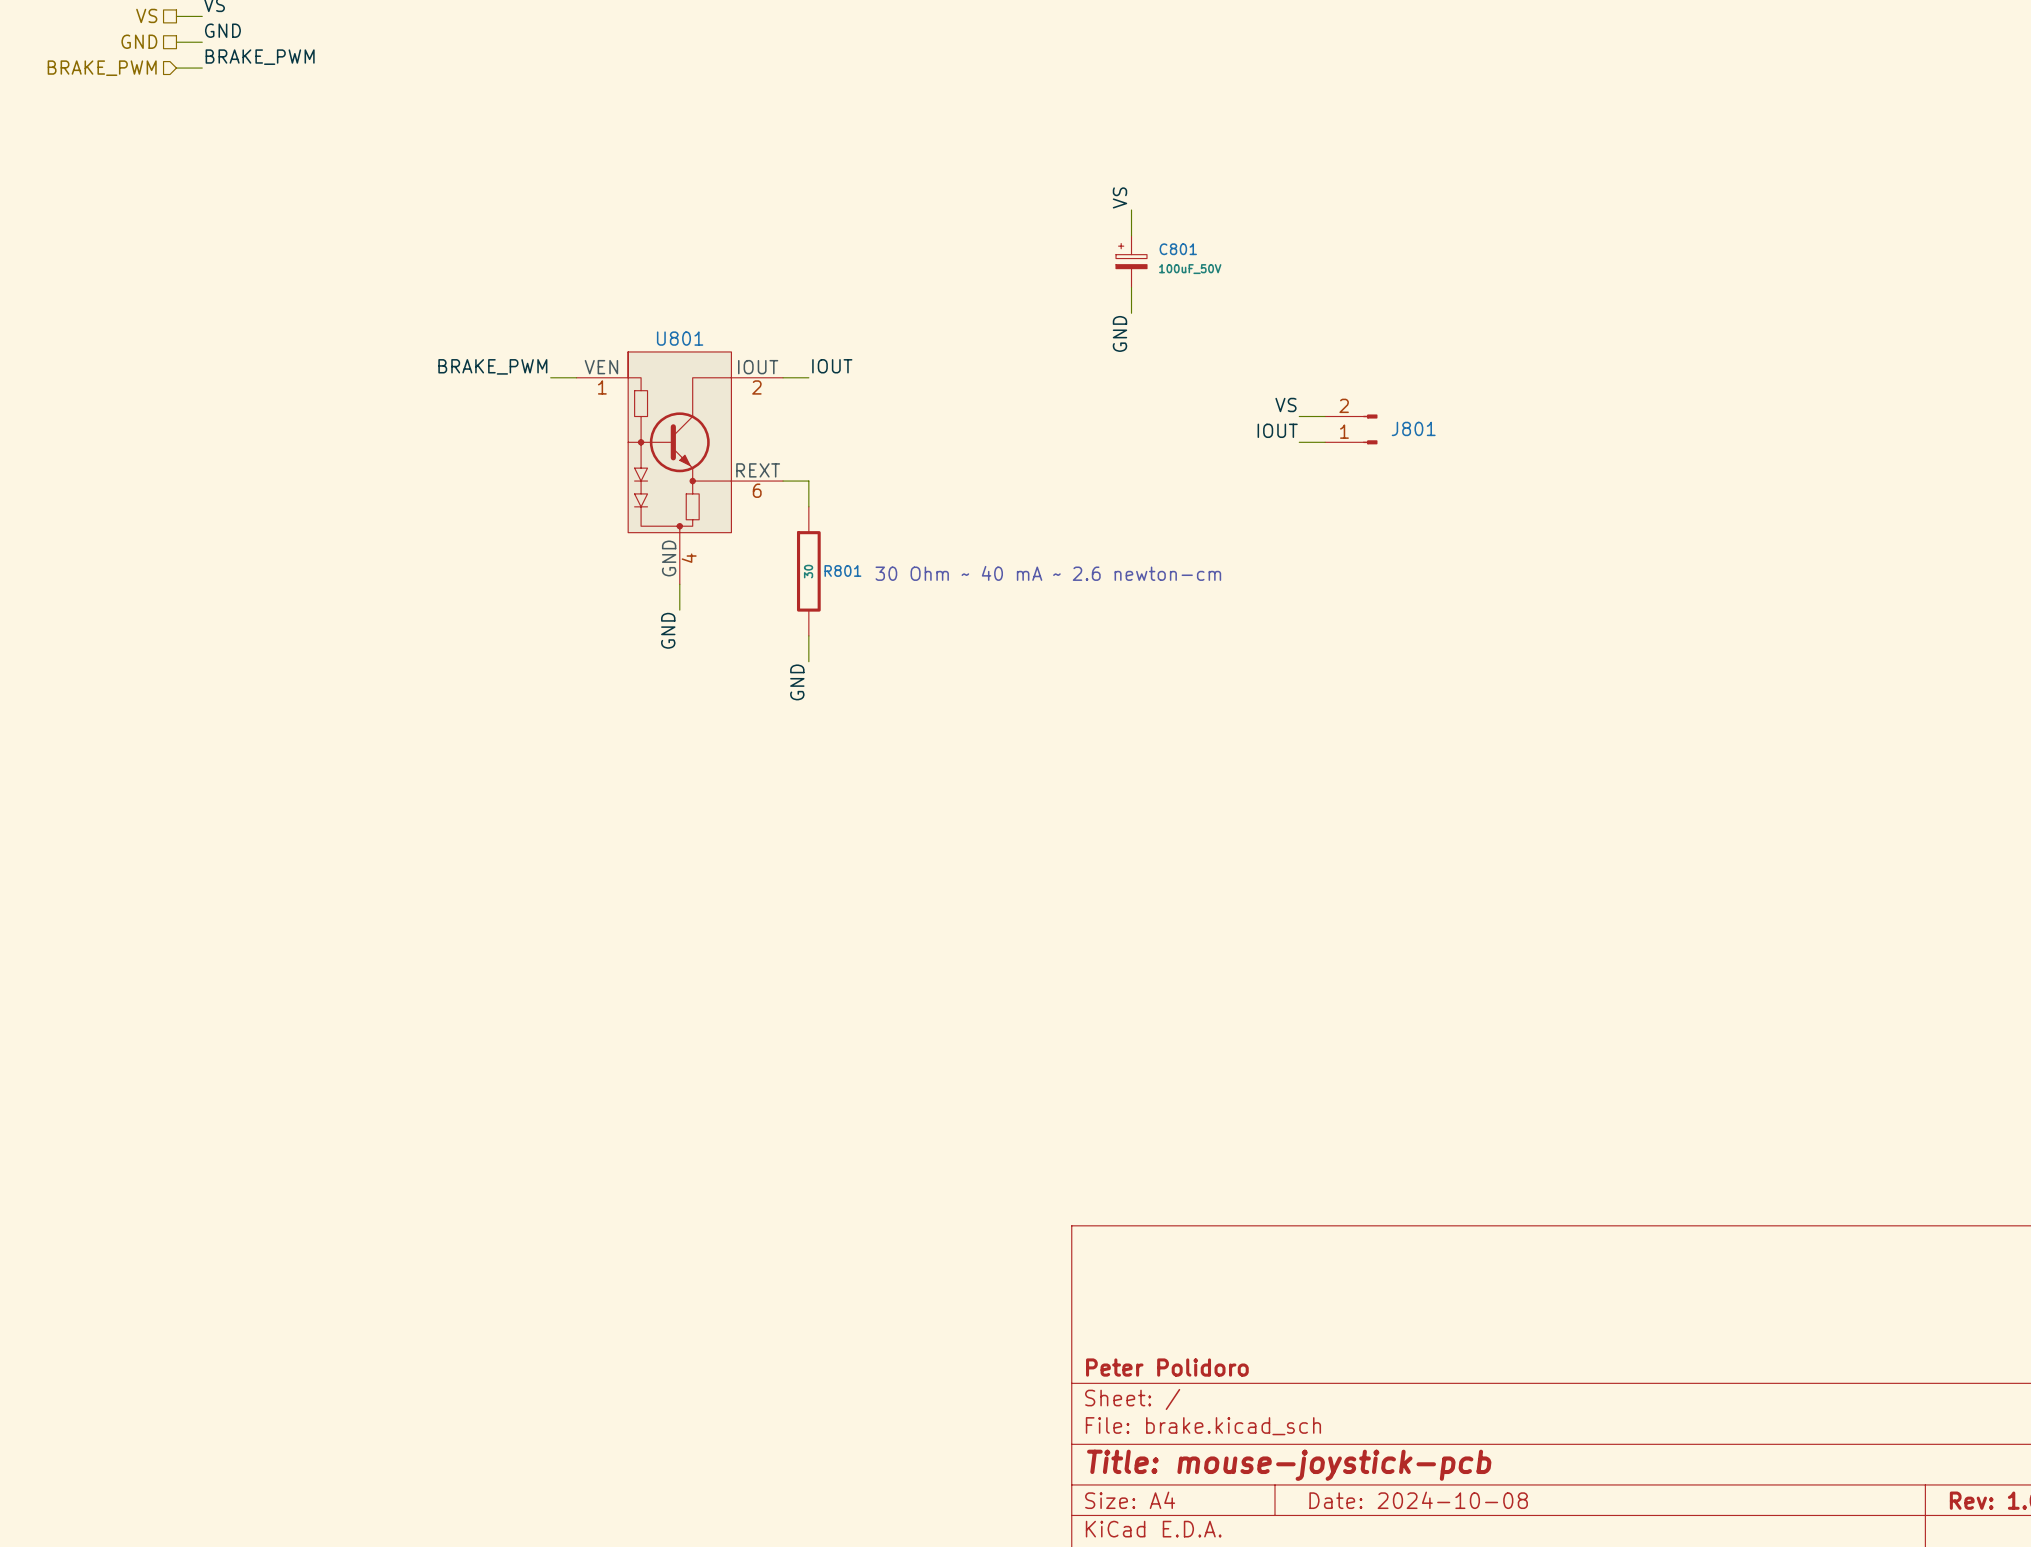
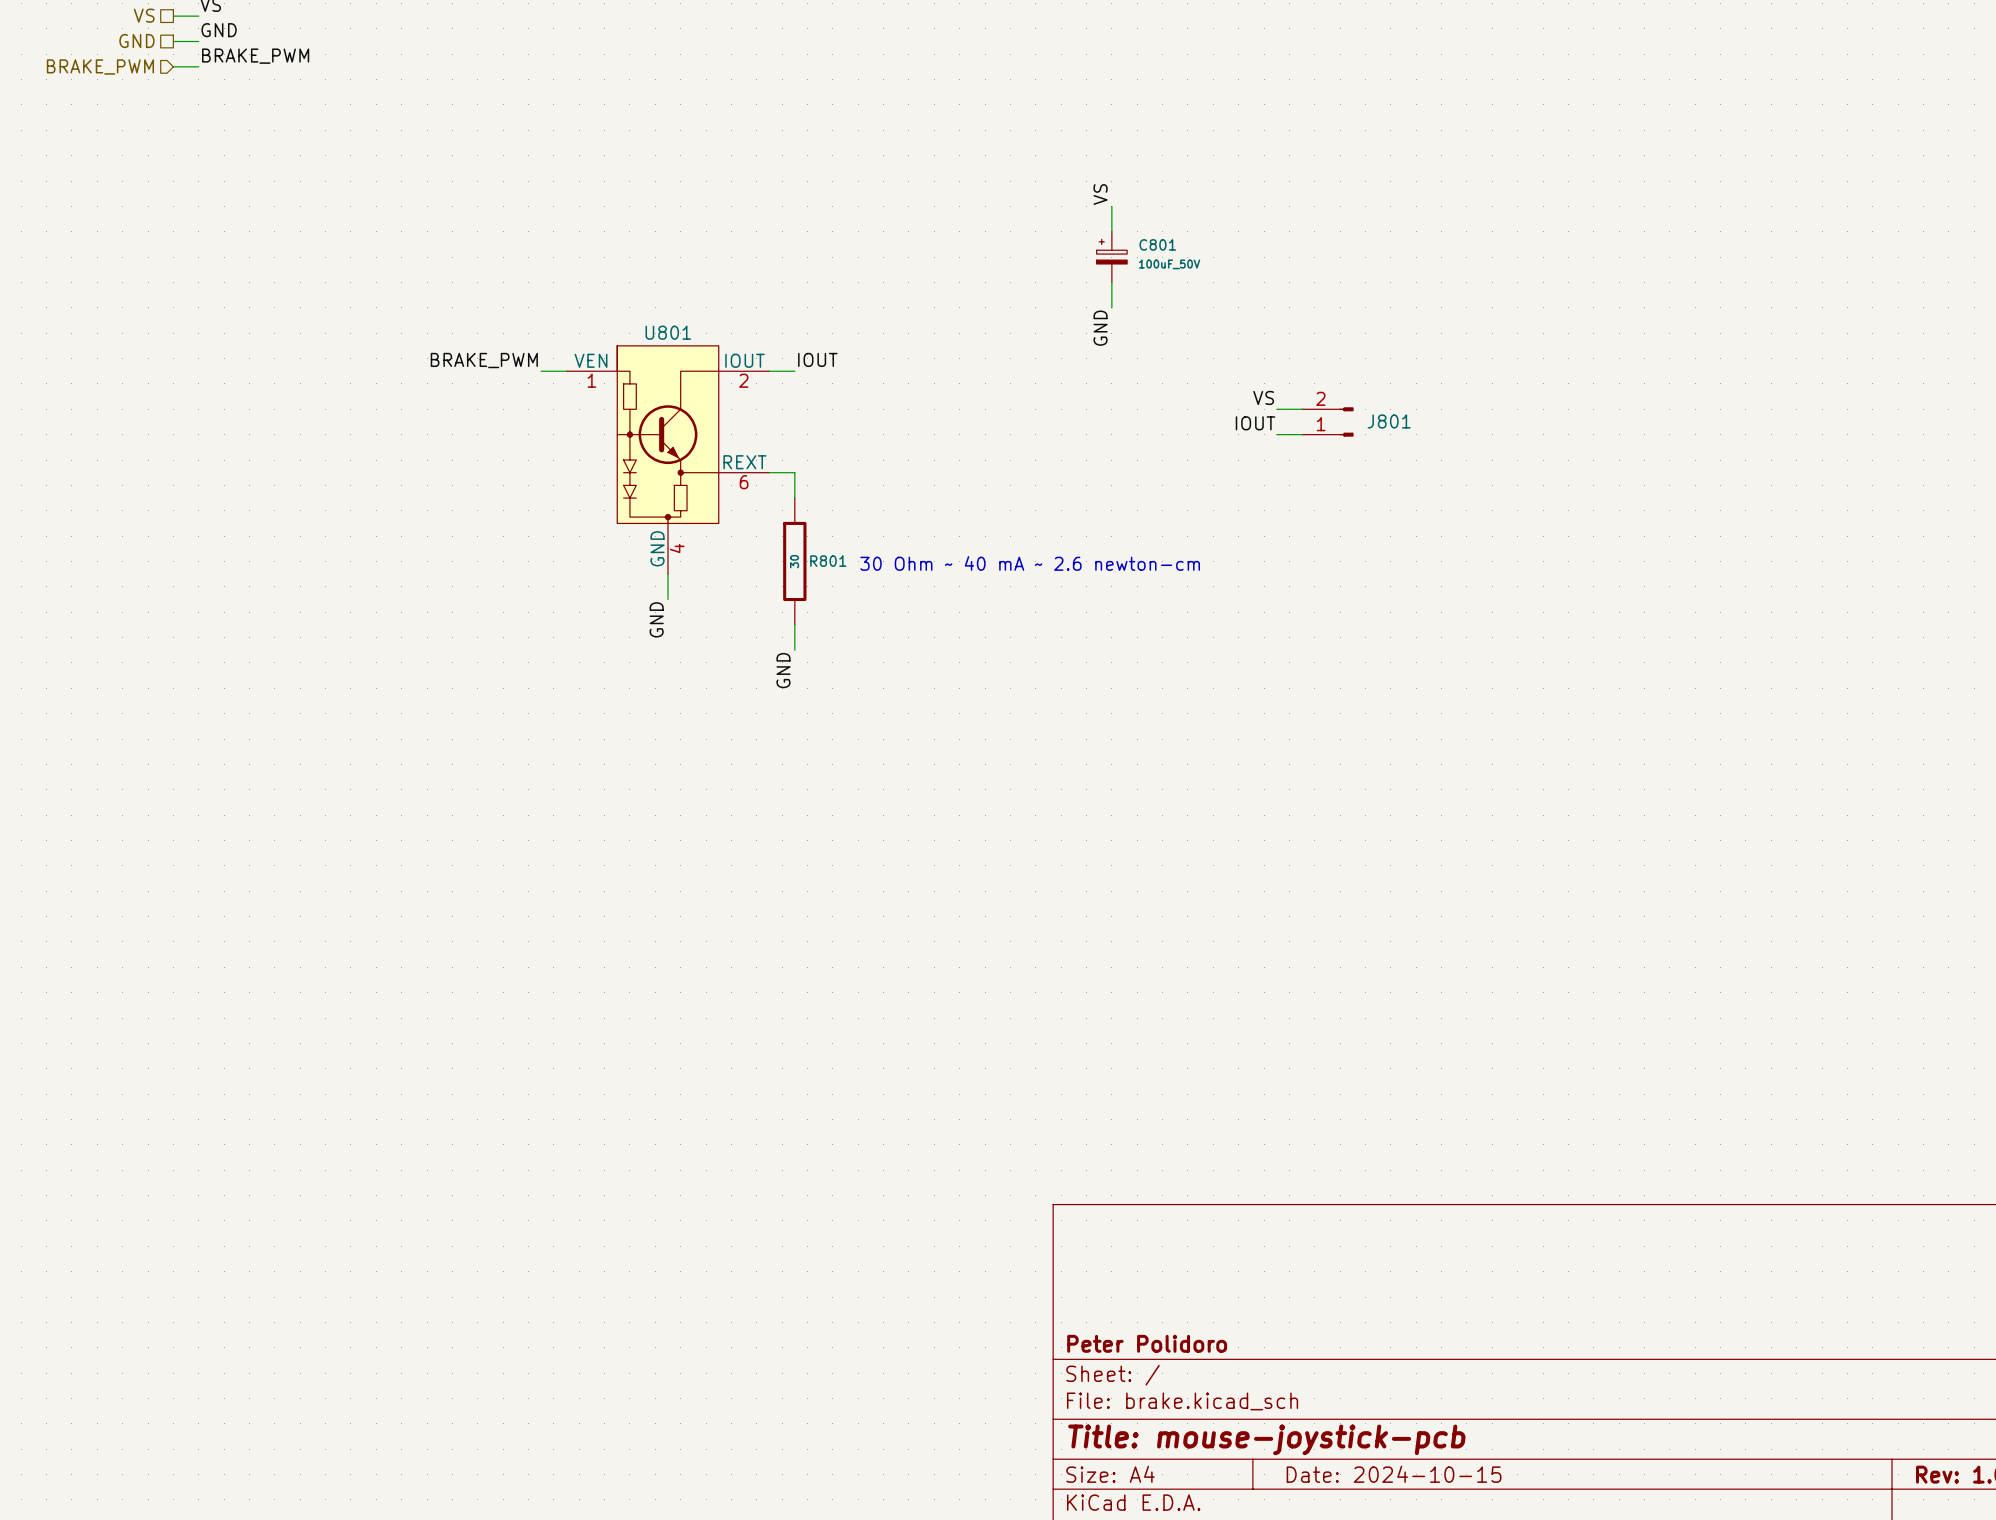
title block: Date: 2024-10-08 (1418, 1500) -> Date: 2024-10-15 (1394, 1474)

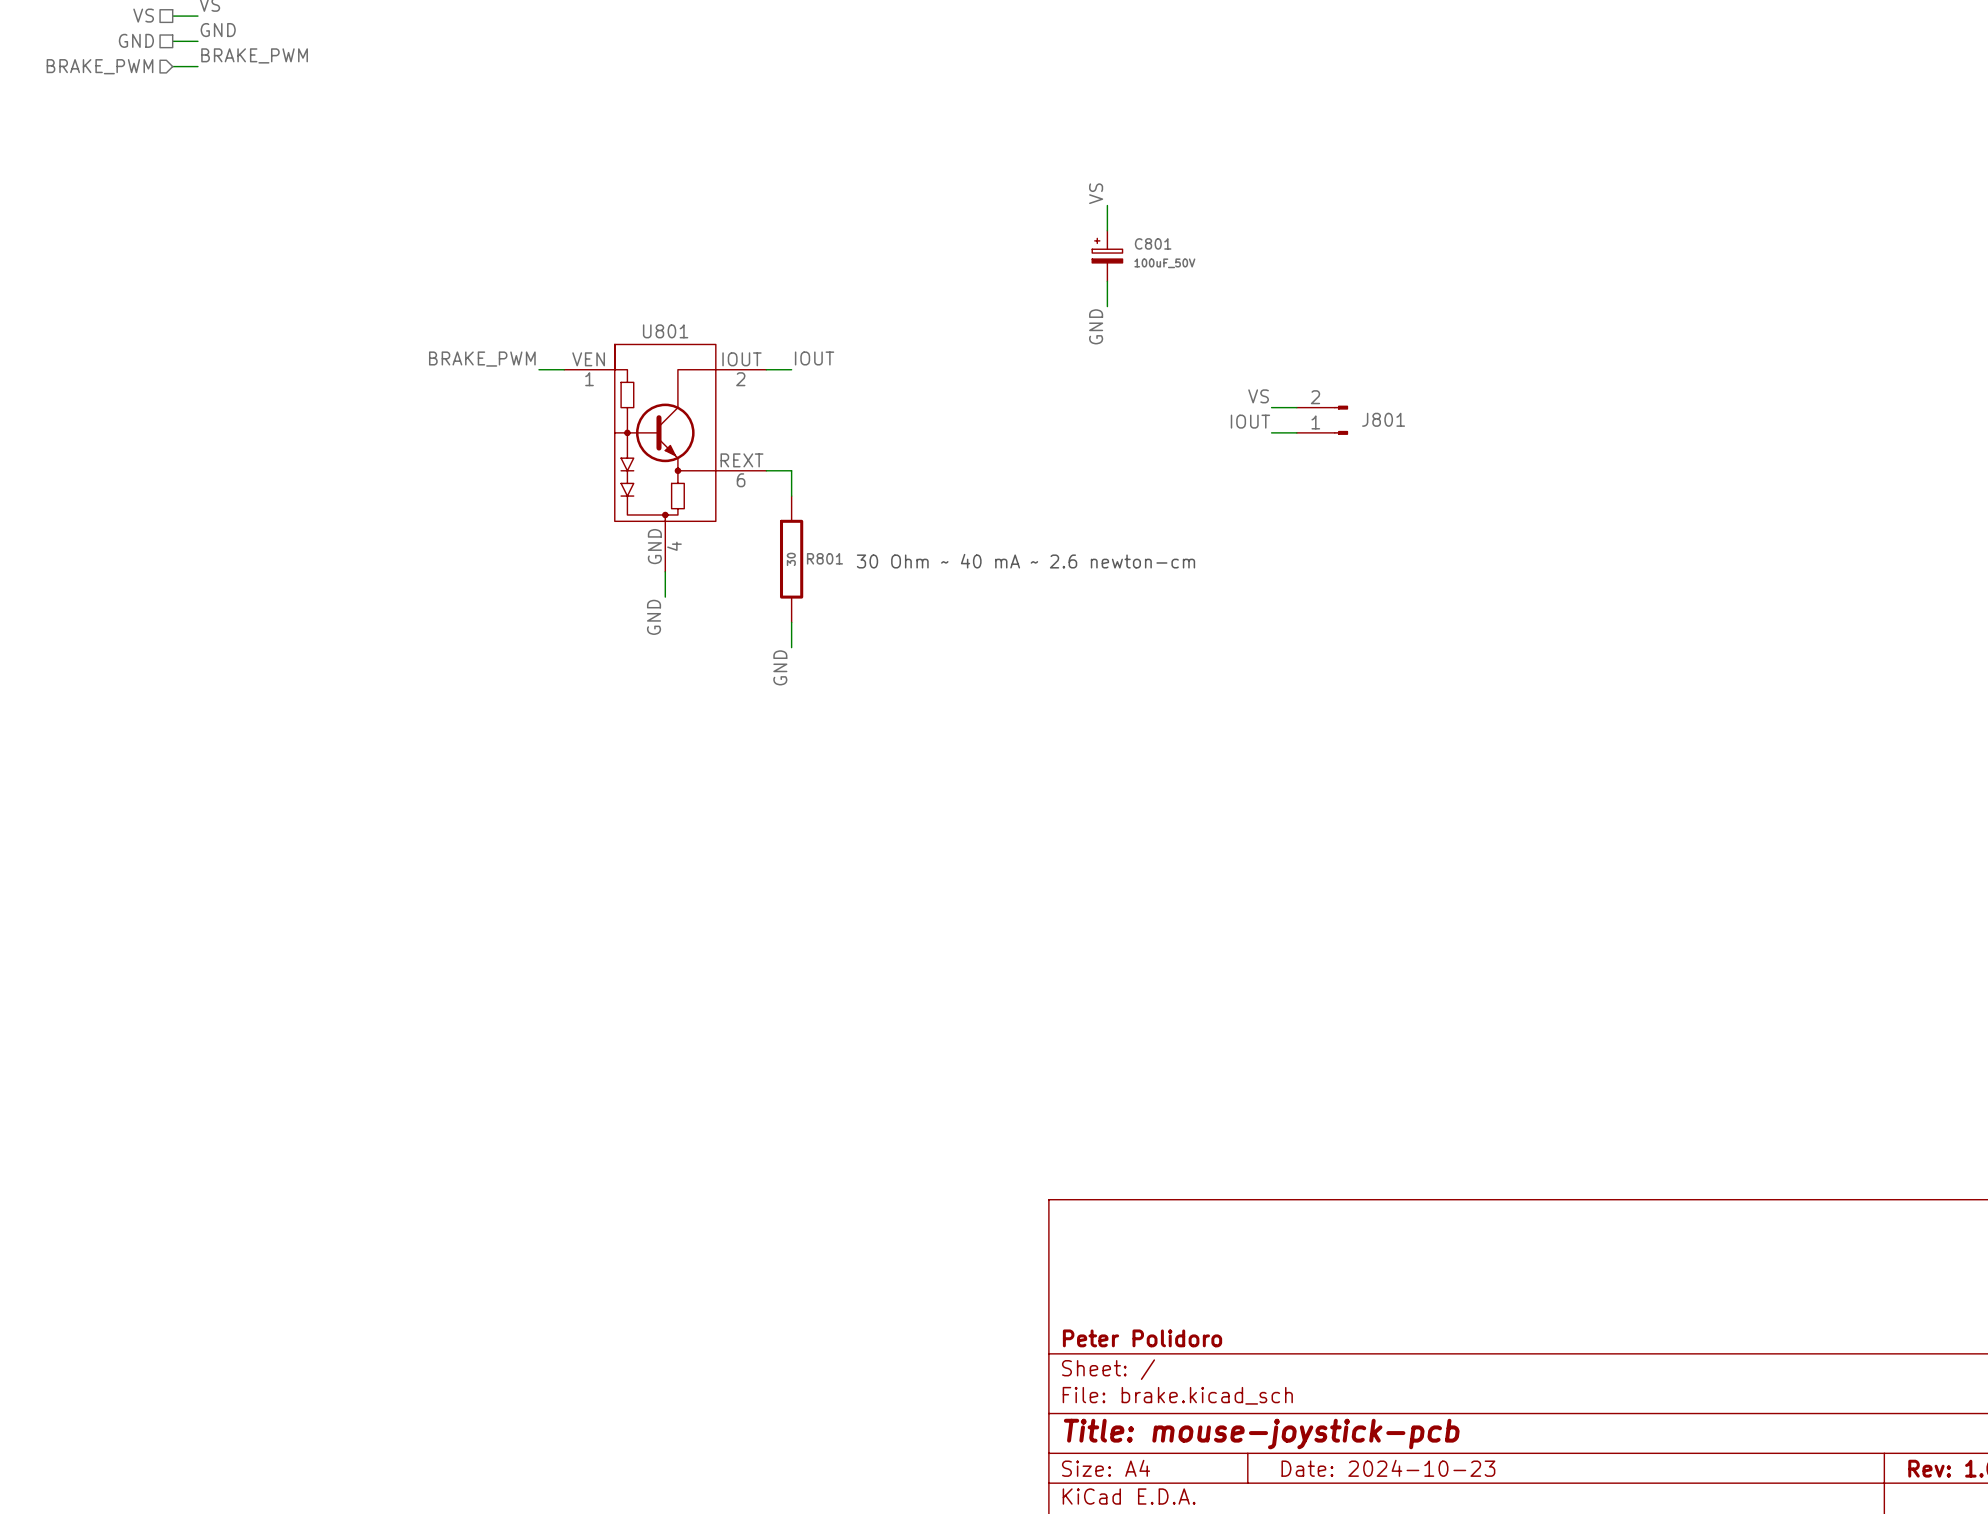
title block: Date: 2024-10-15 (1394, 1474) -> Date: 2024-10-23 (1388, 1468)

